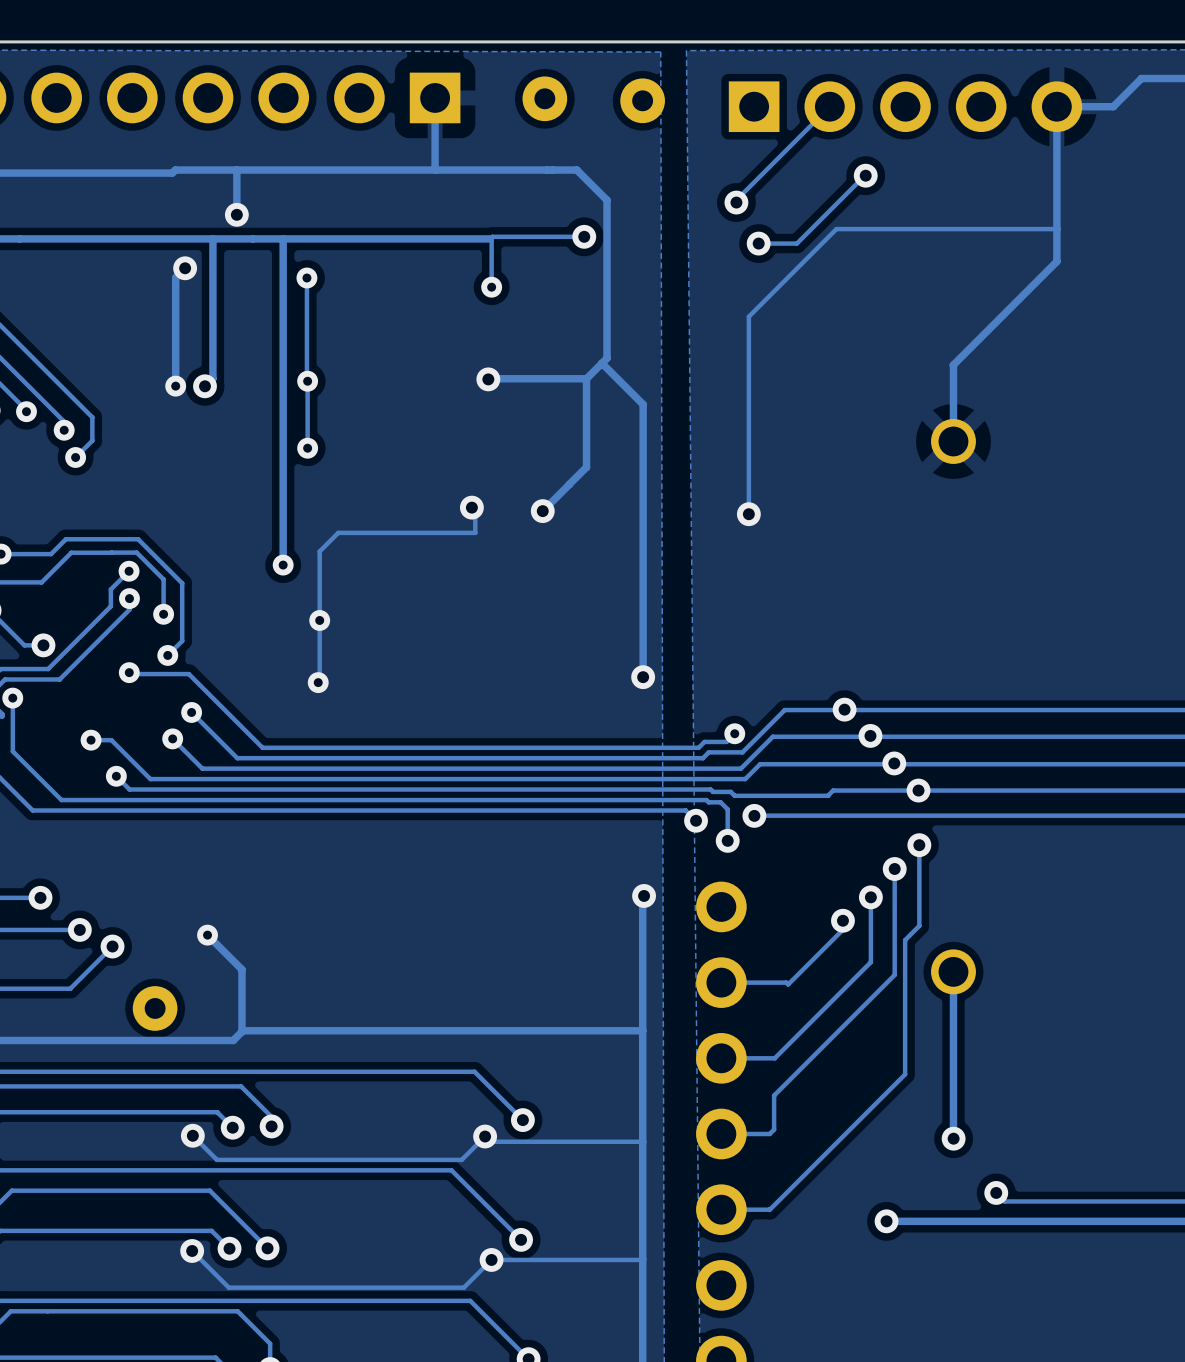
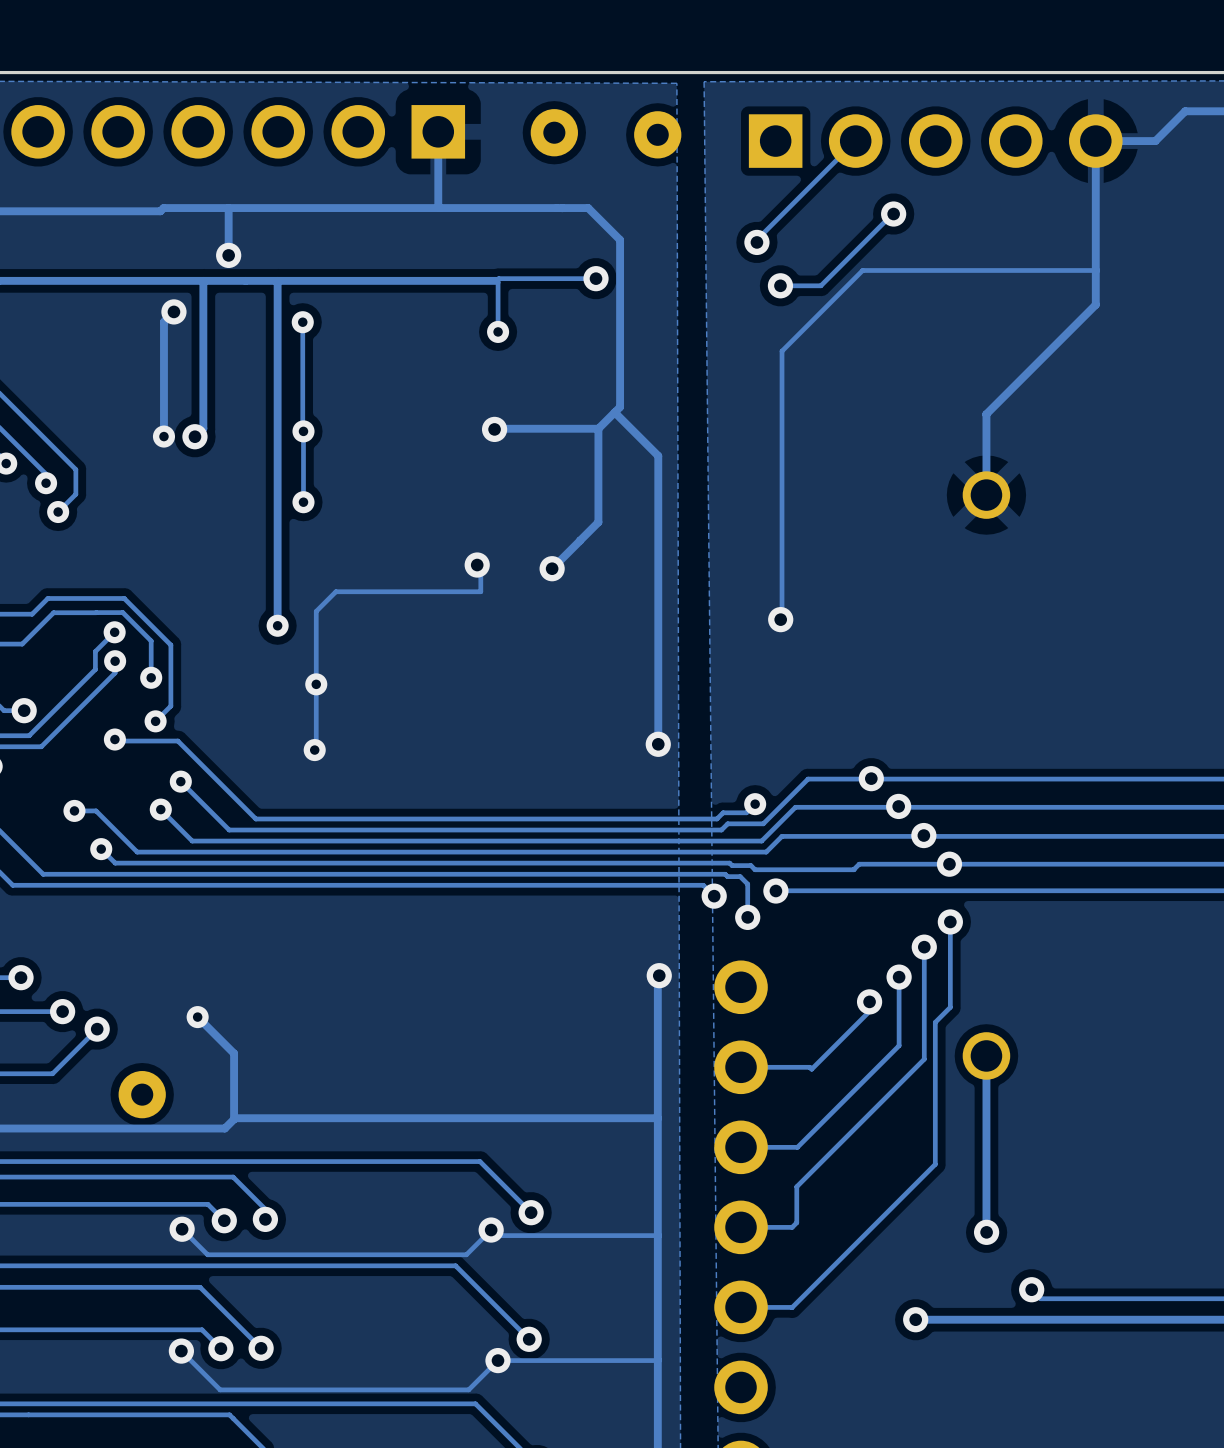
track: (760, 305) (748, 316) (748, 514) -> (782, 351) (780, 619)
via position: (748, 514) -> (780, 619)

